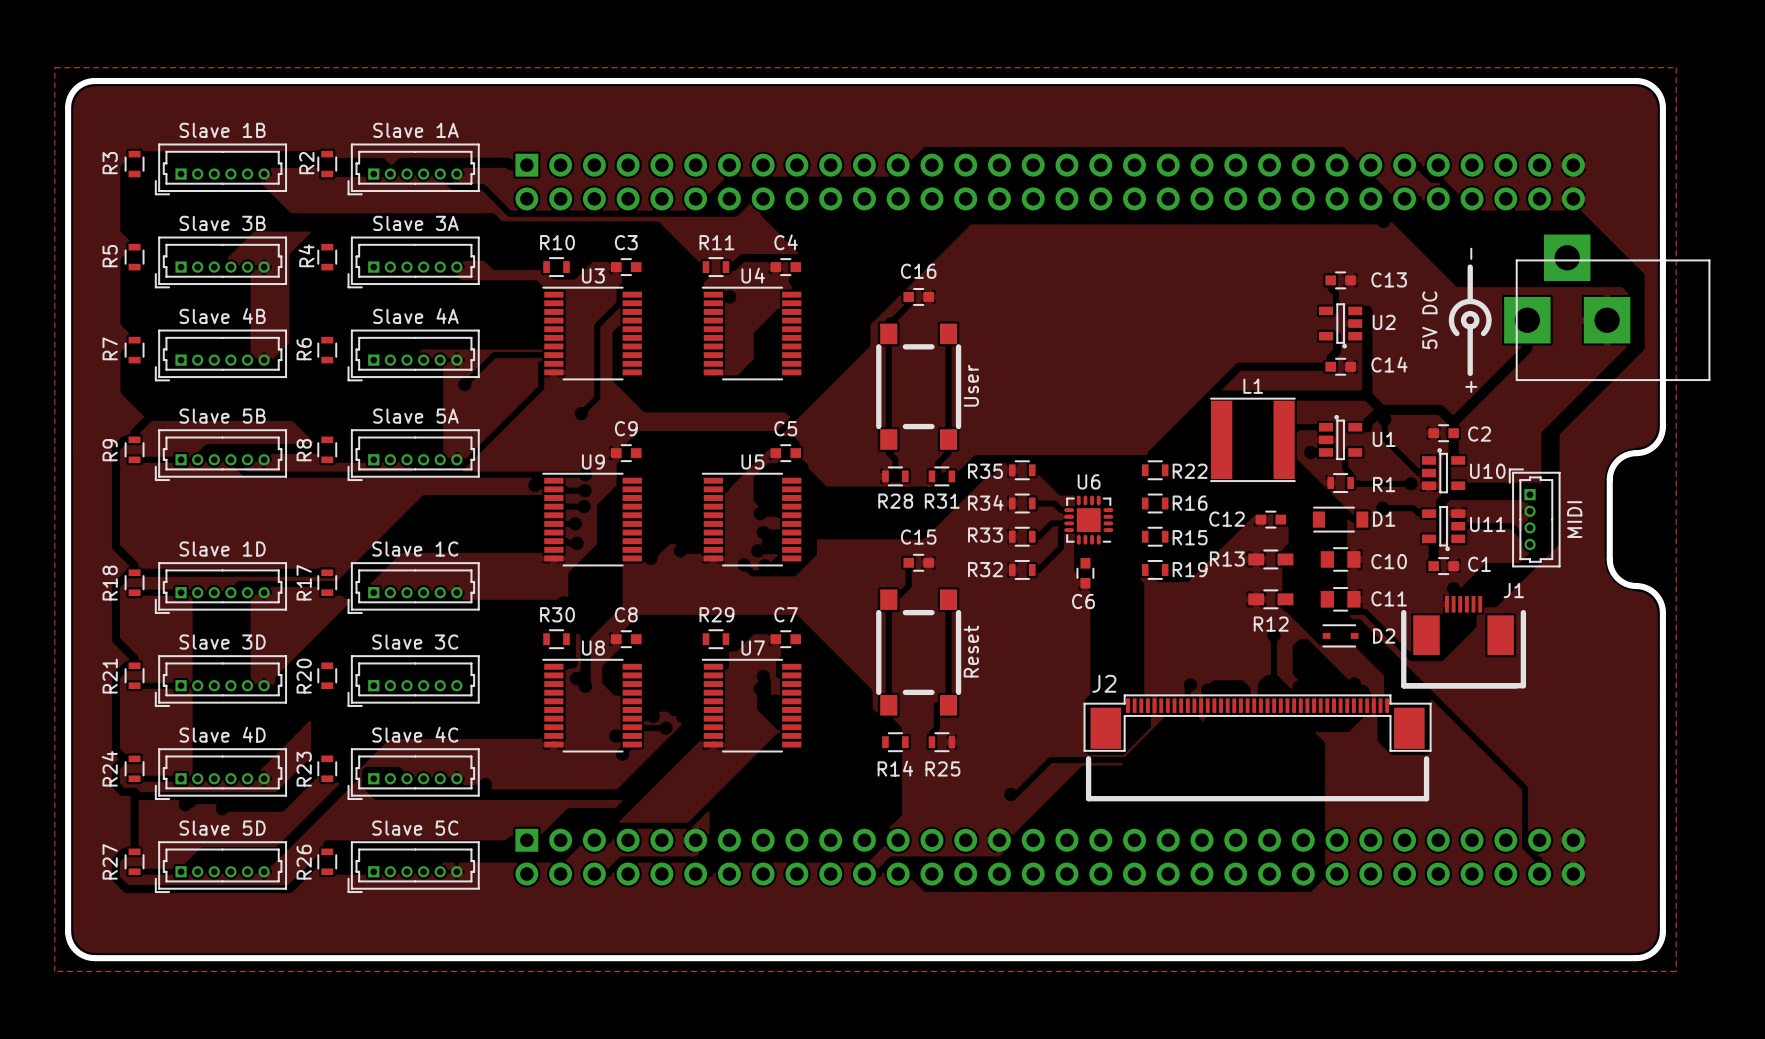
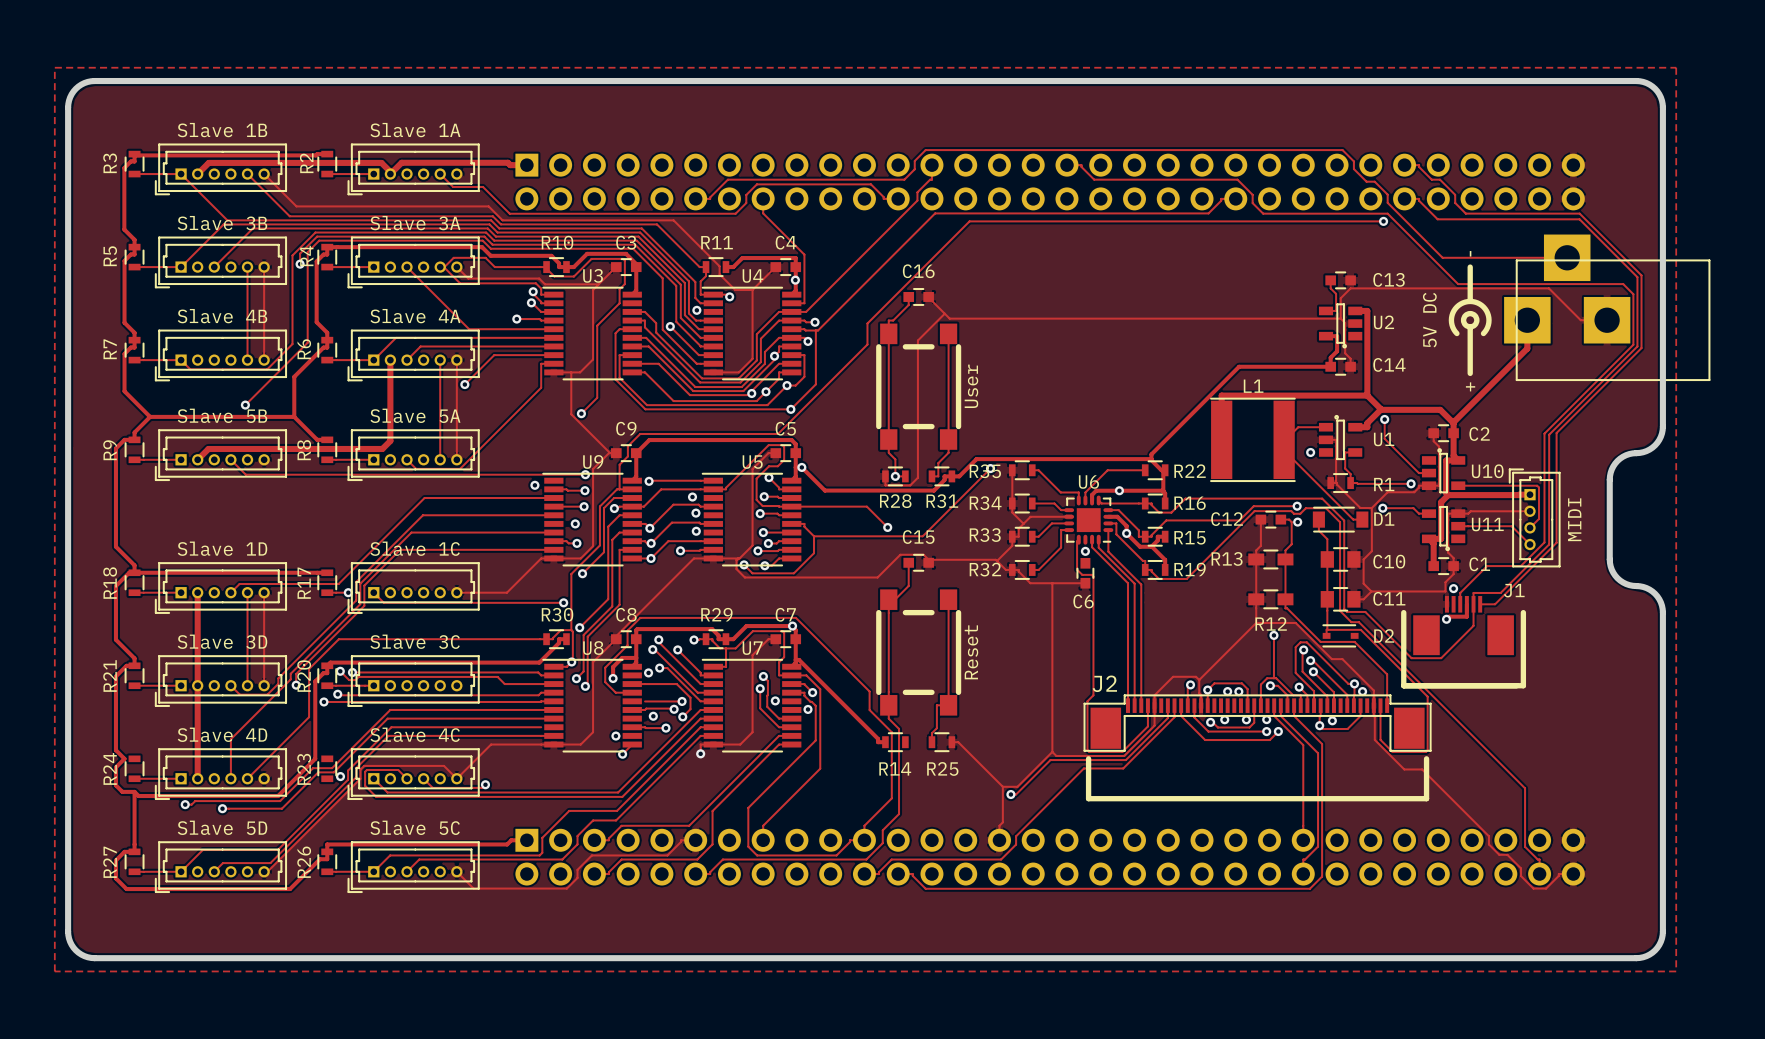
track: none -> (134, 154) (134, 161) (130, 161) (124, 168) (124, 229) (134, 239) (134, 254) (130, 254) (124, 260) (124, 322) (134, 332) (134, 347) (130, 347) (124, 353) (124, 391) (150, 416)
track: none -> (327, 154) (134, 155)
track: none -> (526, 165) (510, 165) (507, 162) (401, 162) (390, 174)
track: none -> (931, 165) (931, 179) (917, 192) (917, 200) (806, 311) (779, 311) (756, 334) (756, 360) (738, 378) (702, 378) (656, 332) (656, 323) (644, 311) (632, 311)
track: none -> (1066, 165) (1081, 165) (1094, 179) (1237, 179) (1252, 194) (1252, 203) (1263, 213) (1387, 213) (1458, 284) (1623, 284) (1633, 294) (1633, 344) (1544, 433) (1544, 542) (1520, 566) (1487, 566) (1460, 592) (1460, 604)
track: none -> (1404, 165) (1419, 165) (1431, 179) (1440, 179) (1455, 194) (1455, 202) (1465, 213) (1579, 213) (1641, 275) (1641, 348) (1556, 433) (1556, 542) (1495, 604) (1480, 604)
track: none -> (391, 172) (381, 162) (208, 162) (197, 174)
track: none -> (134, 174) (181, 174) (227, 220) (491, 220) (499, 228) (641, 228) (695, 282) (695, 298) (700, 303) (713, 303)
track: none -> (247, 174) (289, 216) (492, 216) (500, 224) (657, 224) (699, 267) (706, 267) (706, 276) (700, 281) (700, 294) (727, 294) (729, 296)
track: none -> (264, 174) (296, 206) (488, 206) (502, 220) (673, 220) (719, 266) (719, 274) (735, 290) (752, 290)
track: none -> (327, 174) (373, 174)
track: none -> (440, 174) (453, 186) (483, 186) (509, 213) (735, 213) (746, 203) (746, 194) (756, 184) (870, 184) (883, 198) (898, 198)
track: none -> (695, 198) (710, 198) (727, 179) (904, 179) (914, 169) (914, 161) (925, 150) (1342, 150) (1353, 161) (1353, 169) (1366, 181) (1374, 181) (1387, 194) (1387, 202) (1442, 257) (1567, 257)
track: none -> (763, 198) (763, 213) (804, 254) (804, 303) (791, 303)
track: none -> (1235, 198) (1221, 198) (1208, 213) (935, 213) (818, 330) (791, 329)
track: none -> (1404, 198) (1419, 198) (1437, 219) (1579, 219) (1637, 277) (1637, 346) (1549, 434) (1549, 544) (1500, 592) (1473, 592) (1473, 625) (1441, 658) (1411, 658) (1365, 611) (1347, 611) (1344, 609) (1344, 520) (1322, 498) (1185, 498) (1171, 512) (1159, 512) (1151, 503) (1101, 503) (1098, 500)
track: none -> (1383, 221) (969, 221) (867, 323) (867, 344) (778, 433) (640, 433) (627, 446) (627, 456) (619, 464) (619, 489)
via: none -> (1383, 221)
track: none -> (300, 264) (300, 253) (317, 236) (484, 236) (492, 244) (635, 244) (676, 285) (676, 321) (700, 346) (713, 346)
via: none -> (300, 264)
track: none -> (134, 267) (181, 267) (223, 224) (489, 224) (497, 232) (640, 232) (688, 281) (688, 313) (696, 320) (713, 320)
track: none -> (214, 267) (252, 228) (487, 228) (495, 236) (638, 236) (684, 283) (684, 315) (698, 329) (713, 329)
track: none -> (247, 267) (247, 360)
track: none -> (264, 267) (264, 360)
track: none -> (327, 267) (373, 267)
track: none -> (407, 267) (469, 329) (553, 329)
track: none -> (440, 267) (443, 267) (460, 283) (535, 283) (541, 288) (541, 294) (553, 294)
track: none -> (456, 267) (468, 278) (539, 278) (545, 284) (598, 284)
track: none -> (544, 267) (554, 276) (573, 276) (591, 258) (624, 260) (624, 284) (619, 289) (619, 303) (597, 325) (597, 397) (581, 413)
track: none -> (546, 267) (494, 267) (485, 257) (453, 257) (444, 267)
track: none -> (616, 267) (593, 290) (593, 359) (580, 372) (553, 372)
track: none -> (725, 267) (733, 267) (742, 258) (795, 258) (795, 290) (791, 294)
track: none -> (775, 267) (752, 290)
via: none -> (795, 280)
track: none -> (1330, 280) (1330, 288) (1336, 293) (1336, 310) (1326, 310)
track: none -> (752, 290) (752, 358) (738, 372) (713, 372)
track: none -> (533, 291) (541, 303) (553, 303)
via: none -> (533, 291)
track: none -> (632, 294) (636, 290) (636, 264) (626, 253) (587, 253) (573, 267) (559, 267) (559, 263) (551, 255) (490, 255) (482, 247) (327, 247) (327, 254) (323, 254) (316, 261) (316, 322) (327, 332) (327, 347) (323, 347) (294, 376) (294, 416)
via: none -> (729, 296)
track: none -> (908, 296) (908, 305) (893, 320) (888, 320) (888, 452) (895, 459) (895, 476) (905, 476)
track: none -> (928, 296) (949, 318) (1340, 318)
track: none -> (531, 302) (541, 311) (553, 311)
via: none -> (531, 302)
via: none -> (696, 310)
track: none -> (1355, 310) (1367, 310) (1367, 395)
track: none -> (944, 313) (917, 340) (917, 477) (910, 485) (885, 485) (885, 476)
track: none -> (1340, 318) (1340, 298) (1350, 288) (1548, 288) (1580, 320) (1607, 320)
track: none -> (1340, 318) (1345, 323) (1345, 353) (1350, 358) (1350, 366)
track: none -> (516, 319) (553, 320)
via: none -> (516, 319)
track: none -> (632, 320) (644, 320) (644, 327) (700, 382) (740, 382) (760, 362) (760, 338) (779, 320) (815, 322)
track: none -> (1527, 320) (1527, 348) (1453, 422) (1453, 455) (1458, 460) (1446, 460) (1446, 492) (1448, 495)
via: none -> (815, 322)
track: none -> (670, 326) (698, 355) (713, 355)
via: none -> (670, 326)
track: none -> (632, 329) (619, 329) (615, 333) (615, 379) (645, 409) (790, 409) (815, 384) (815, 330)
track: none -> (948, 333) (948, 452) (938, 463) (938, 476) (931, 476)
track: none -> (1326, 336) (1337, 336) (1337, 351) (1330, 357) (1330, 366) (1239, 366) (1151, 454) (1151, 460) (1161, 470) (1165, 470)
track: none -> (553, 337) (396, 337) (373, 360) (327, 360)
track: none -> (632, 337) (646, 337) (695, 387) (741, 387) (764, 363) (764, 351) (779, 337) (804, 337) (807, 341)
track: none -> (713, 337) (700, 337) (680, 318) (680, 284) (636, 240) (494, 240) (486, 232) (315, 232) (292, 255) (292, 344) (267, 369) (190, 369) (181, 360) (134, 360)
via: none -> (807, 341)
track: none -> (553, 346) (420, 346) (407, 360)
track: none -> (632, 346) (648, 346) (693, 391) (743, 391) (774, 359) (774, 356) (779, 351) (779, 346) (791, 346)
track: none -> (553, 355) (494, 355) (464, 384)
track: none -> (632, 355) (619, 355) (619, 377) (647, 405) (767, 405) (787, 385) (795, 385) (804, 376) (804, 355) (791, 355)
via: none -> (774, 356)
track: none -> (390, 360) (390, 440) (382, 448) (208, 448) (197, 459)
track: none -> (440, 360) (440, 459)
track: none -> (456, 360) (456, 459)
track: none -> (553, 363) (541, 363) (541, 387) (460, 468) (416, 468) (407, 459)
track: none -> (632, 363) (658, 363) (689, 395) (750, 395) (751, 391) (779, 363) (791, 363)
track: none -> (713, 363) (696, 363) (662, 329) (662, 278) (633, 248) (490, 248) (482, 240) (319, 240) (307, 252) (307, 342) (245, 405)
track: none -> (571, 372) (571, 414) (610, 453)
track: none -> (632, 372) (644, 372) (673, 401) (756, 401) (779, 378) (779, 372) (791, 372)
via: none -> (464, 384)
via: none -> (787, 385)
via: none -> (766, 391)
via: none -> (751, 393)
track: none -> (1367, 395) (1221, 395) (1221, 439)
track: none -> (1367, 395) (1380, 409)
via: none -> (245, 405)
via: none -> (790, 409)
track: none -> (1380, 409) (1440, 409) (1453, 423)
track: none -> (1380, 409) (1367, 423) (1367, 427) (1355, 427)
via: none -> (581, 413)
track: none -> (150, 416) (134, 432) (134, 439) (124, 439) (115, 448) (115, 546) (134, 565) (134, 572)
track: none -> (150, 416) (294, 416)
track: none -> (294, 416) (317, 439) (327, 439)
track: none -> (1384, 419) (1384, 438) (1418, 473) (1429, 473)
via: none -> (1384, 419)
track: none -> (1326, 427) (1298, 427) (1285, 439)
track: none -> (1433, 433) (1433, 441) (1439, 446) (1439, 485) (1418, 485) (1414, 492) (1387, 492) (1371, 508)
track: none -> (1285, 439) (1285, 451) (1353, 519) (1362, 519)
track: none -> (1326, 439) (1336, 439) (1334, 483)
via: none -> (1310, 452)
track: none -> (1355, 452) (1345, 452) (1345, 468) (1350, 474) (1350, 483) (1411, 483)
track: none -> (616, 453) (608, 453) (593, 469) (593, 546) (580, 558) (541, 558) (506, 592) (456, 592)
track: none -> (775, 453) (768, 453) (752, 469) (752, 545) (739, 558) (693, 558) (616, 636) (616, 639)
track: none -> (134, 459) (181, 459)
track: none -> (230, 459) (245, 474) (585, 474)
track: none -> (327, 459) (373, 459)
track: none -> (1151, 459) (976, 459) (959, 476) (944, 476) (944, 480) (934, 490) (824, 490) (801, 467) (795, 467)
via: none -> (801, 467)
track: none -> (990, 468) (922, 536) (814, 536)
via: none -> (990, 468)
track: none -> (1012, 470) (1012, 512) (1023, 523)
track: none -> (1032, 470) (1038, 470) (1060, 492) (1078, 492) (1078, 500)
track: none -> (1145, 470) (1107, 470) (1085, 492) (1085, 500)
track: none -> (1163, 470) (1165, 503)
via: none -> (585, 474)
via: none -> (895, 476)
track: none -> (768, 477) (779, 489) (791, 489)
via: none -> (768, 477)
track: none -> (632, 480) (636, 476) (636, 453) (649, 440) (791, 440) (795, 444) (795, 476) (791, 480)
track: none -> (713, 480) (649, 481)
via: none -> (649, 481)
track: none -> (1330, 483) (1337, 483) (1360, 508) (1371, 508)
via: none -> (1411, 483)
via: none -> (534, 485)
track: none -> (1458, 485) (1537, 485) (1539, 487) (1539, 518) (1530, 527)
track: none -> (553, 489) (584, 490)
track: none -> (632, 489) (617, 489) (599, 506) (599, 545) (571, 574) (571, 630)
via: none -> (584, 490)
via: none -> (1119, 490)
track: none -> (1163, 490) (1096, 490) (1092, 494) (1092, 500)
track: none -> (1530, 494) (1448, 495)
track: none -> (1448, 495) (1441, 502) (1441, 538) (1429, 538) (1433, 543) (1433, 566)
track: none -> (764, 496) (791, 497)
via: none -> (764, 496)
track: none -> (553, 497) (424, 497) (338, 583) (239, 583) (230, 592)
track: none -> (632, 497) (614, 497) (604, 508) (604, 552) (582, 573)
via: none -> (692, 497)
track: none -> (1032, 503) (1054, 503) (1061, 510) (1069, 510)
track: none -> (553, 506) (584, 506)
via: none -> (584, 506)
track: none -> (713, 506) (673, 504) (649, 528) (645, 523) (632, 523)
track: none -> (1297, 506) (1253, 506) (1239, 520) (1166, 520) (1151, 536) (1138, 536) (1138, 530) (1118, 510) (1108, 510)
via: none -> (1297, 506)
track: none -> (614, 508) (619, 506) (643, 506) (661, 489) (726, 489) (768, 445) (782, 445) (784, 446) (784, 459) (777, 466) (769, 466) (756, 478) (756, 499) (762, 506) (866, 506) (887, 527)
via: none -> (614, 508)
track: none -> (1371, 508) (1371, 551) (1363, 559) (1363, 583) (1371, 591)
track: none -> (1382, 508) (1413, 508) (1418, 513) (1429, 513)
via: none -> (1382, 508)
track: none -> (1530, 511) (1470, 511) (1468, 513) (1448, 513) (1448, 552) (1453, 558) (1453, 574) (1445, 582) (1445, 591) (1371, 591)
via: none -> (695, 513)
track: none -> (760, 513) (791, 515)
via: none -> (760, 513)
track: none -> (553, 515) (422, 515) (356, 582) (356, 600) (278, 678) (278, 683) (267, 694) (239, 694) (230, 685)
track: none -> (632, 515) (619, 515) (608, 526) (608, 599) (579, 627)
track: none -> (1069, 516) (1030, 516) (1018, 528) (1018, 536) (1012, 536) (1012, 545) (997, 561)
track: none -> (1108, 516) (1117, 516) (1126, 526) (1126, 533) (1139, 546) (1151, 546) (1157, 540) (1157, 536) (1165, 536)
track: none -> (1260, 519) (1260, 545) (1256, 550) (1256, 623)
track: none -> (1280, 519) (1289, 519) (1291, 522) (1291, 544) (1285, 550) (1285, 608) (1320, 641) (1354, 641) (1387, 674) (1387, 705)
track: none -> (1318, 519) (1318, 530) (1327, 539) (1327, 629)
via: none -> (1297, 522)
via: none -> (575, 523)
track: none -> (713, 523) (671, 522) (651, 543) (632, 541)
track: none -> (791, 523) (804, 523) (804, 526) (814, 536)
track: none -> (1069, 523) (1051, 523) (1038, 536) (1032, 536)
track: none -> (1108, 523) (1116, 523) (1116, 534) (1142, 560) (1145, 560) (1145, 569) (1151, 569) (1159, 578) (1186, 578) (1254, 511) (1291, 511) (1294, 513) (1300, 513) (1305, 508) (1326, 508) (1340, 522) (1340, 610) (1351, 622) (1358, 622) (1525, 788) (1525, 846) (1539, 859) (1539, 874)
track: none -> (1458, 526) (1511, 526) (1530, 544)
via: none -> (887, 527)
via: none -> (649, 528)
track: none -> (1069, 530) (1061, 530) (1061, 547) (1038, 569) (1032, 569)
track: none -> (1108, 530) (1108, 551) (1141, 584) (1141, 705)
via: none -> (696, 531)
track: none -> (553, 532) (411, 532) (360, 583) (360, 604) (290, 673) (290, 679) (230, 739) (230, 778)
track: none -> (632, 532) (619, 532) (612, 539) (612, 606) (583, 635) (583, 671) (576, 678)
track: none -> (763, 532) (791, 532)
via: none -> (763, 532)
via: none -> (1126, 533)
track: none -> (814, 536) (814, 553) (793, 573) (752, 573) (744, 564)
track: none -> (1078, 539) (1077, 541) (1077, 569) (1082, 574) (1093, 576) (1093, 695) (1087, 701) (1087, 750) (1089, 751) (1122, 751) (1147, 726) (1147, 705)
track: none -> (1092, 539) (1092, 547) (1127, 583) (1127, 705)
track: none -> (1098, 539) (1098, 547) (1134, 583) (1134, 705)
track: none -> (553, 541) (576, 543)
track: none -> (713, 541) (668, 541) (651, 558) (632, 558)
track: none -> (791, 541) (768, 543)
via: none -> (576, 543)
via: none -> (651, 543)
via: none -> (768, 543)
track: none -> (1151, 546) (1165, 559) (1165, 569)
track: none -> (553, 549) (400, 549) (364, 585) (364, 605) (296, 674) (296, 685)
track: none -> (632, 549) (619, 549) (619, 604) (587, 636) (587, 684) (585, 686)
track: none -> (713, 549) (680, 550)
track: none -> (791, 549) (757, 550)
via: none -> (680, 550)
via: none -> (757, 550)
via: none -> (1085, 551)
via: none -> (651, 558)
track: none -> (738, 558) (736, 569) (744, 577) (877, 577) (900, 554) (923, 554) (928, 559)
track: none -> (791, 558) (779, 558) (771, 565) (764, 565)
track: none -> (928, 559) (995, 559) (1005, 569) (1018, 569) (1030, 583) (1085, 583)
track: none -> (908, 562) (908, 585) (888, 605)
via: none -> (744, 564)
via: none -> (764, 565)
track: none -> (327, 572) (129, 572) (115, 586) (115, 639) (134, 658) (134, 665) (126, 665) (115, 676) (115, 750) (124, 758) (115, 767) (115, 785) (122, 791) (134, 791)
via: none -> (582, 573)
track: none -> (1052, 583) (1052, 751)
via: none -> (1453, 588)
track: none -> (1371, 591) (1363, 599) (1353, 599)
track: none -> (134, 592) (181, 592)
track: none -> (197, 592) (197, 778)
track: none -> (247, 592) (247, 685)
track: none -> (264, 592) (264, 685)
track: none -> (327, 592) (348, 592)
via: none -> (348, 592)
track: none -> (373, 592) (383, 602) (563, 602)
track: none -> (888, 599) (888, 718) (899, 728) (899, 814) (882, 830) (882, 843) (866, 859) (722, 859) (710, 874) (695, 874)
track: none -> (948, 599) (948, 705) (936, 705) (936, 728) (931, 733) (931, 742)
via: none -> (563, 602)
track: none -> (1466, 604) (1466, 616) (1449, 616) (1446, 619)
via: none -> (1446, 619)
track: none -> (1256, 623) (1295, 623) (1331, 659) (1342, 659) (1373, 690) (1374, 739) (1404, 769) (1422, 769) (1488, 836) (1488, 844) (1499, 854) (1507, 854) (1521, 868) (1521, 876) (1533, 888) (1546, 888) (1558, 874) (1573, 874)
track: none -> (1256, 623) (1199, 680)
via: none -> (792, 626)
via: none -> (579, 627)
track: none -> (571, 630) (560, 630) (552, 639) (338, 639) (309, 668) (309, 717) (247, 778)
track: none -> (571, 630) (572, 660) (566, 666) (553, 666)
track: none -> (1273, 635) (1273, 678)
via: none -> (1273, 635)
track: none -> (1326, 635) (1326, 629) (1360, 629) (1427, 696) (1427, 750) (1392, 751) (1380, 739) (1380, 705)
track: none -> (566, 639) (559, 639) (559, 642) (539, 662) (330, 662) (327, 665) (327, 673) (323, 673) (315, 681) (315, 758) (278, 796) (138, 796) (134, 791)
track: none -> (616, 639) (593, 662) (593, 732) (580, 744) (491, 744) (456, 778) (444, 765) (364, 765) (360, 769) (360, 778) (267, 871) (264, 871)
track: none -> (658, 639) (658, 642) (700, 684) (713, 684)
via: none -> (658, 639)
track: none -> (694, 639) (712, 639) (720, 648) (735, 648) (752, 631) (782, 631) (784, 657) (779, 662) (779, 675) (806, 675) (820, 689) (820, 768) (763, 825) (763, 840)
via: none -> (694, 639)
track: none -> (775, 639) (768, 639) (752, 655) (752, 732) (740, 744) (700, 744) (700, 753)
track: none -> (726, 648) (726, 666) (713, 666)
track: none -> (652, 649) (697, 692) (713, 692)
via: none -> (652, 649)
track: none -> (677, 649) (700, 672) (700, 675) (713, 675)
via: none -> (677, 649)
track: none -> (1303, 649) (1302, 671) (1327, 695) (1327, 705)
via: none -> (1303, 649)
track: none -> (636, 657) (622, 657) (613, 667) (613, 678)
track: none -> (795, 659) (799, 659) (878, 738) (878, 742) (885, 742)
track: none -> (1310, 660) (1313, 660) (1347, 694) (1347, 705)
via: none -> (1310, 660)
via: none -> (571, 661)
track: none -> (632, 666) (636, 662) (637, 629) (712, 629) (718, 635) (718, 639) (733, 639) (746, 626) (792, 626) (795, 630) (795, 662) (791, 666)
track: none -> (659, 668) (667, 668) (700, 701) (713, 701)
via: none -> (659, 668)
track: none -> (340, 671) (349, 680) (355, 680) (358, 676) (497, 676) (504, 684) (553, 684)
via: none -> (340, 671)
track: none -> (1313, 671) (1333, 692) (1333, 705)
via: none -> (1313, 671)
track: none -> (352, 672) (538, 672) (541, 675) (553, 675)
via: none -> (352, 672)
via: none -> (648, 672)
track: none -> (763, 676) (767, 680) (767, 706) (779, 718) (791, 718)
via: none -> (763, 676)
via: none -> (576, 678)
via: none -> (613, 678)
track: none -> (1199, 680) (1196, 676) (1173, 676) (1154, 695) (1154, 725) (1124, 756) (1056, 756) (1052, 751)
track: none -> (1199, 680) (1201, 705)
via: none -> (1354, 683)
track: none -> (632, 684) (676, 684) (690, 697) (690, 709) (682, 716)
track: none -> (791, 684) (804, 684) (812, 692)
track: none -> (1190, 684) (1187, 687) (1187, 705)
via: none -> (1190, 684)
track: none -> (134, 685) (181, 685)
via: none -> (296, 685)
track: none -> (327, 685) (373, 685)
track: none -> (1270, 685) (1277, 685) (1287, 695) (1287, 705)
via: none -> (1270, 685)
via: none -> (585, 686)
track: none -> (1299, 687) (1307, 695) (1307, 705)
via: none -> (1299, 687)
track: none -> (760, 688) (760, 708) (779, 727) (791, 727)
via: none -> (760, 688)
via: none -> (1207, 690)
via: none -> (1227, 691)
via: none -> (1238, 691)
via: none -> (1362, 691)
track: none -> (553, 692) (541, 692) (538, 695) (337, 694)
track: none -> (632, 692) (615, 692) (605, 682) (605, 667) (627, 645) (627, 630) (640, 617) (795, 617) (869, 691) (869, 710) (891, 732) (891, 798) (864, 825) (864, 840) (849, 840) (836, 855) (757, 855) (748, 846) (748, 807) (815, 740) (815, 705) (804, 695) (804, 692) (791, 692)
via: none -> (812, 692)
via: none -> (337, 694)
via: none -> (775, 700)
via: none -> (323, 701)
track: none -> (553, 701) (323, 701)
track: none -> (645, 701) (682, 701)
via: none -> (682, 701)
track: none -> (1167, 705) (1167, 718) (1125, 760) (1050, 760) (1016, 794) (1010, 794)
track: none -> (1174, 705) (1174, 717) (1123, 768) (1083, 768) (1016, 836) (1016, 844) (1001, 859) (891, 859) (878, 874) (864, 874)
track: none -> (1181, 705) (1181, 716) (1205, 740) (1269, 740) (1278, 731)
track: none -> (1194, 705) (1194, 717) (1208, 731) (1266, 731)
track: none -> (1207, 705) (1207, 690) (1214, 683) (1241, 683) (1247, 689) (1247, 705)
track: none -> (1254, 705) (1254, 722) (1249, 727) (1217, 727) (1210, 722)
track: none -> (1260, 705) (1260, 684) (1267, 678) (1276, 678) (1293, 695) (1300, 695) (1300, 705)
track: none -> (1274, 705) (1274, 716) (1303, 745) (1303, 840)
track: none -> (1280, 705) (1280, 716) (1318, 753) (1318, 846) (1303, 859) (1303, 874)
track: none -> (1294, 705) (1294, 716) (1322, 744) (1322, 876) (1309, 888) (925, 888) (912, 874) (898, 874)
track: none -> (1314, 705) (1314, 691) (1295, 672) (1295, 647) (1300, 642) (1306, 642) (1348, 683) (1354, 683) (1353, 705)
track: none -> (1320, 705) (1319, 725) (1323, 729) (1347, 729) (1360, 716) (1360, 705)
track: none -> (553, 709) (390, 709) (332, 768) (313, 768) (280, 801) (195, 801) (191, 804) (185, 804)
track: none -> (674, 709) (632, 709)
via: none -> (674, 709)
track: none -> (713, 709) (700, 709) (618, 792) (387, 792) (373, 778)
via: none -> (808, 709)
via: none -> (653, 716)
via: none -> (682, 716)
track: none -> (553, 718) (387, 718) (333, 772) (318, 772) (281, 808) (222, 808)
track: none -> (713, 718) (700, 718) (622, 796) (376, 796) (365, 785) (365, 771) (366, 769) (398, 769) (407, 778)
via: none -> (1224, 719)
via: none -> (1246, 719)
via: none -> (1266, 719)
via: none -> (1332, 720)
via: none -> (1210, 722)
via: none -> (1319, 725)
track: none -> (541, 727) (391, 727) (348, 770) (348, 779) (277, 850) (202, 850) (181, 871) (134, 871)
track: none -> (632, 727) (665, 728)
track: none -> (713, 727) (700, 727) (617, 810) (569, 810) (542, 837) (542, 852) (539, 855) (390, 855) (373, 871) (327, 871)
via: none -> (665, 728)
via: none -> (1266, 731)
via: none -> (1278, 731)
track: none -> (553, 735) (388, 735) (356, 768) (356, 777) (270, 863) (222, 863) (214, 871)
track: none -> (713, 735) (700, 735) (616, 820) (593, 820) (577, 836) (577, 844) (562, 859) (419, 859) (407, 871)
track: none -> (791, 735) (779, 735) (689, 825) (621, 825) (608, 840) (594, 840)
via: none -> (615, 736)
track: none -> (951, 742) (958, 742) (1002, 786)
track: none -> (632, 744) (622, 754)
track: none -> (791, 744) (779, 744) (712, 811) (712, 844) (697, 859) (621, 859) (608, 874) (594, 874)
track: none -> (1052, 751) (1017, 786) (1002, 786)
via: none -> (700, 753)
via: none -> (622, 754)
via: none -> (340, 776)
track: none -> (134, 778) (181, 778)
track: none -> (423, 778) (432, 787) (482, 787) (485, 784)
via: none -> (485, 784)
track: none -> (1002, 786) (1002, 822) (999, 825) (999, 840)
track: none -> (134, 791) (134, 851) (124, 851) (115, 860) (115, 878) (126, 889) (290, 889) (319, 859) (327, 859) (327, 844) (507, 844) (511, 840) (526, 840)
via: none -> (1010, 794)
via: none -> (185, 804)
via: none -> (222, 808)
track: none -> (695, 840) (681, 840) (667, 855) (591, 855) (577, 869) (577, 877) (566, 888) (473, 888) (456, 871)

